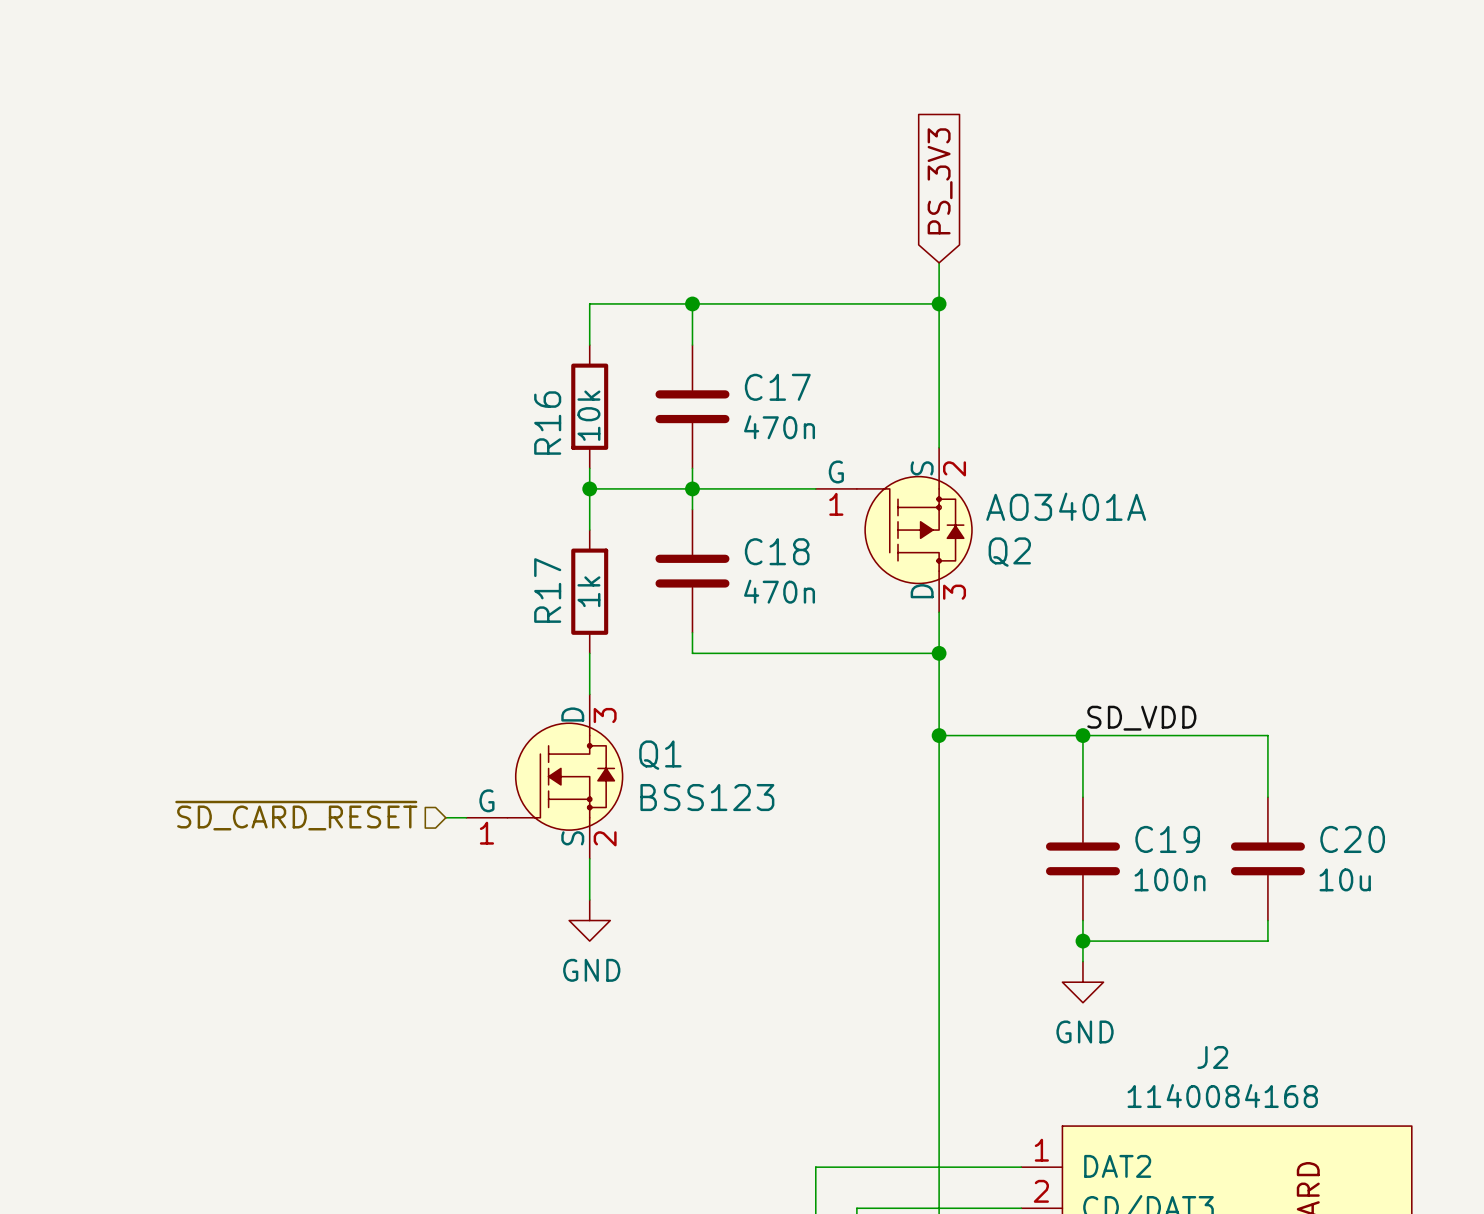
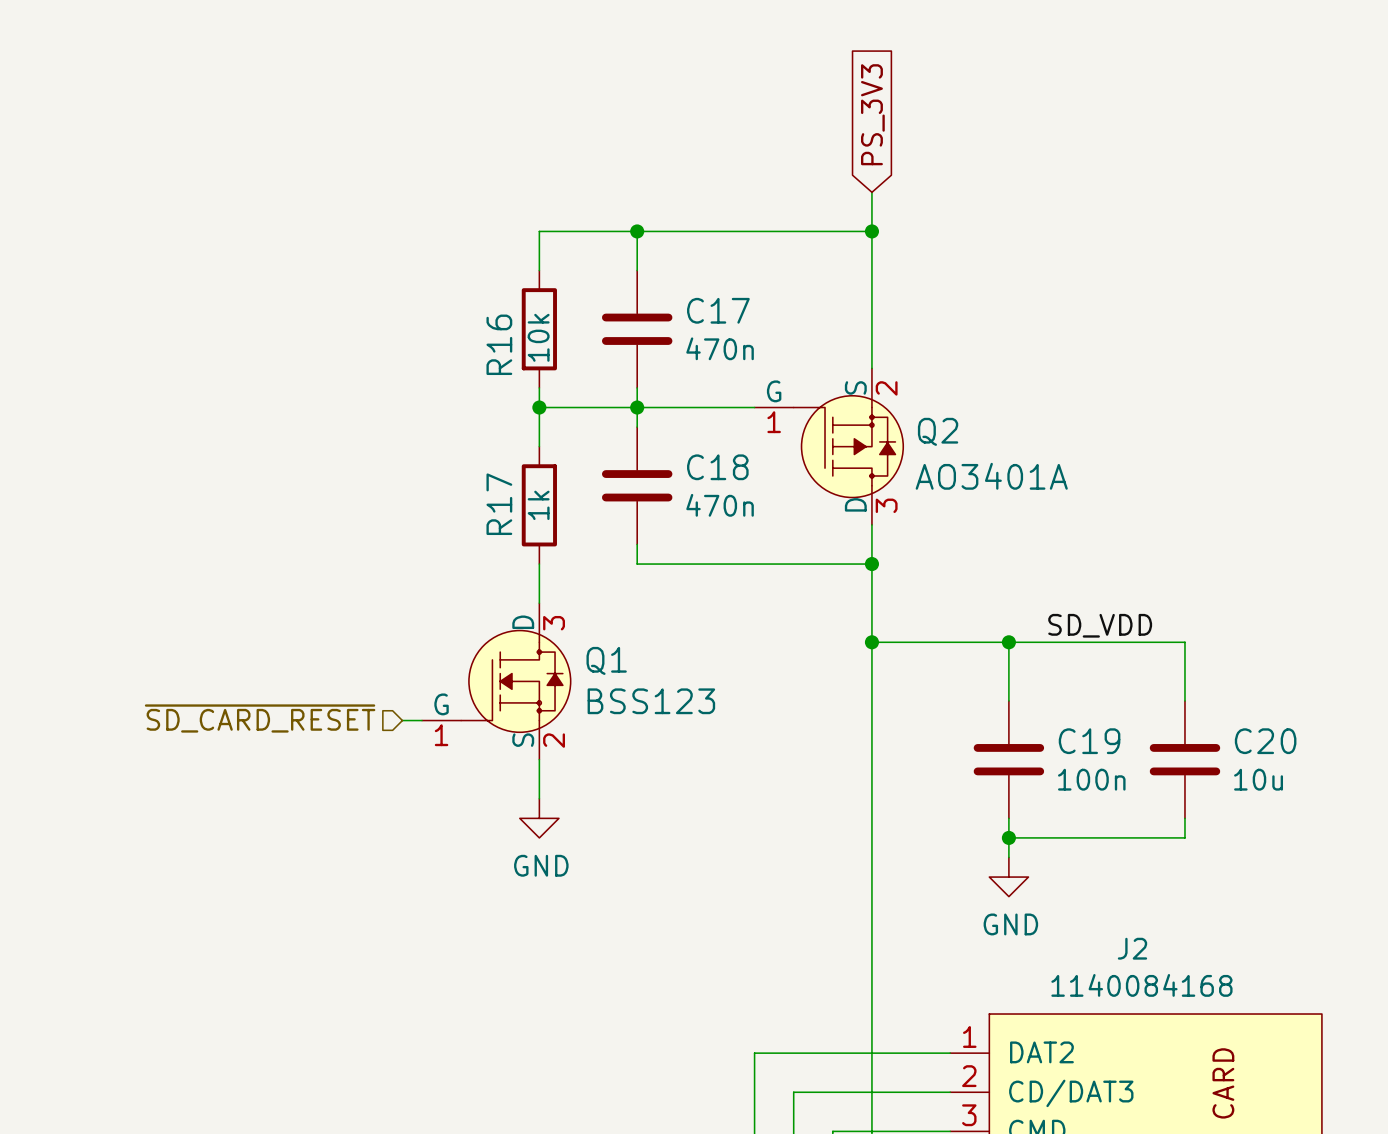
Q2 value position: AO3401A (1066, 506) -> AO3401A (991, 476)
Q2 name position: Q2 (1009, 552) -> Q2 (938, 431)
label position: SD_VDD (1141, 718) -> SD_VDD (1100, 625)

